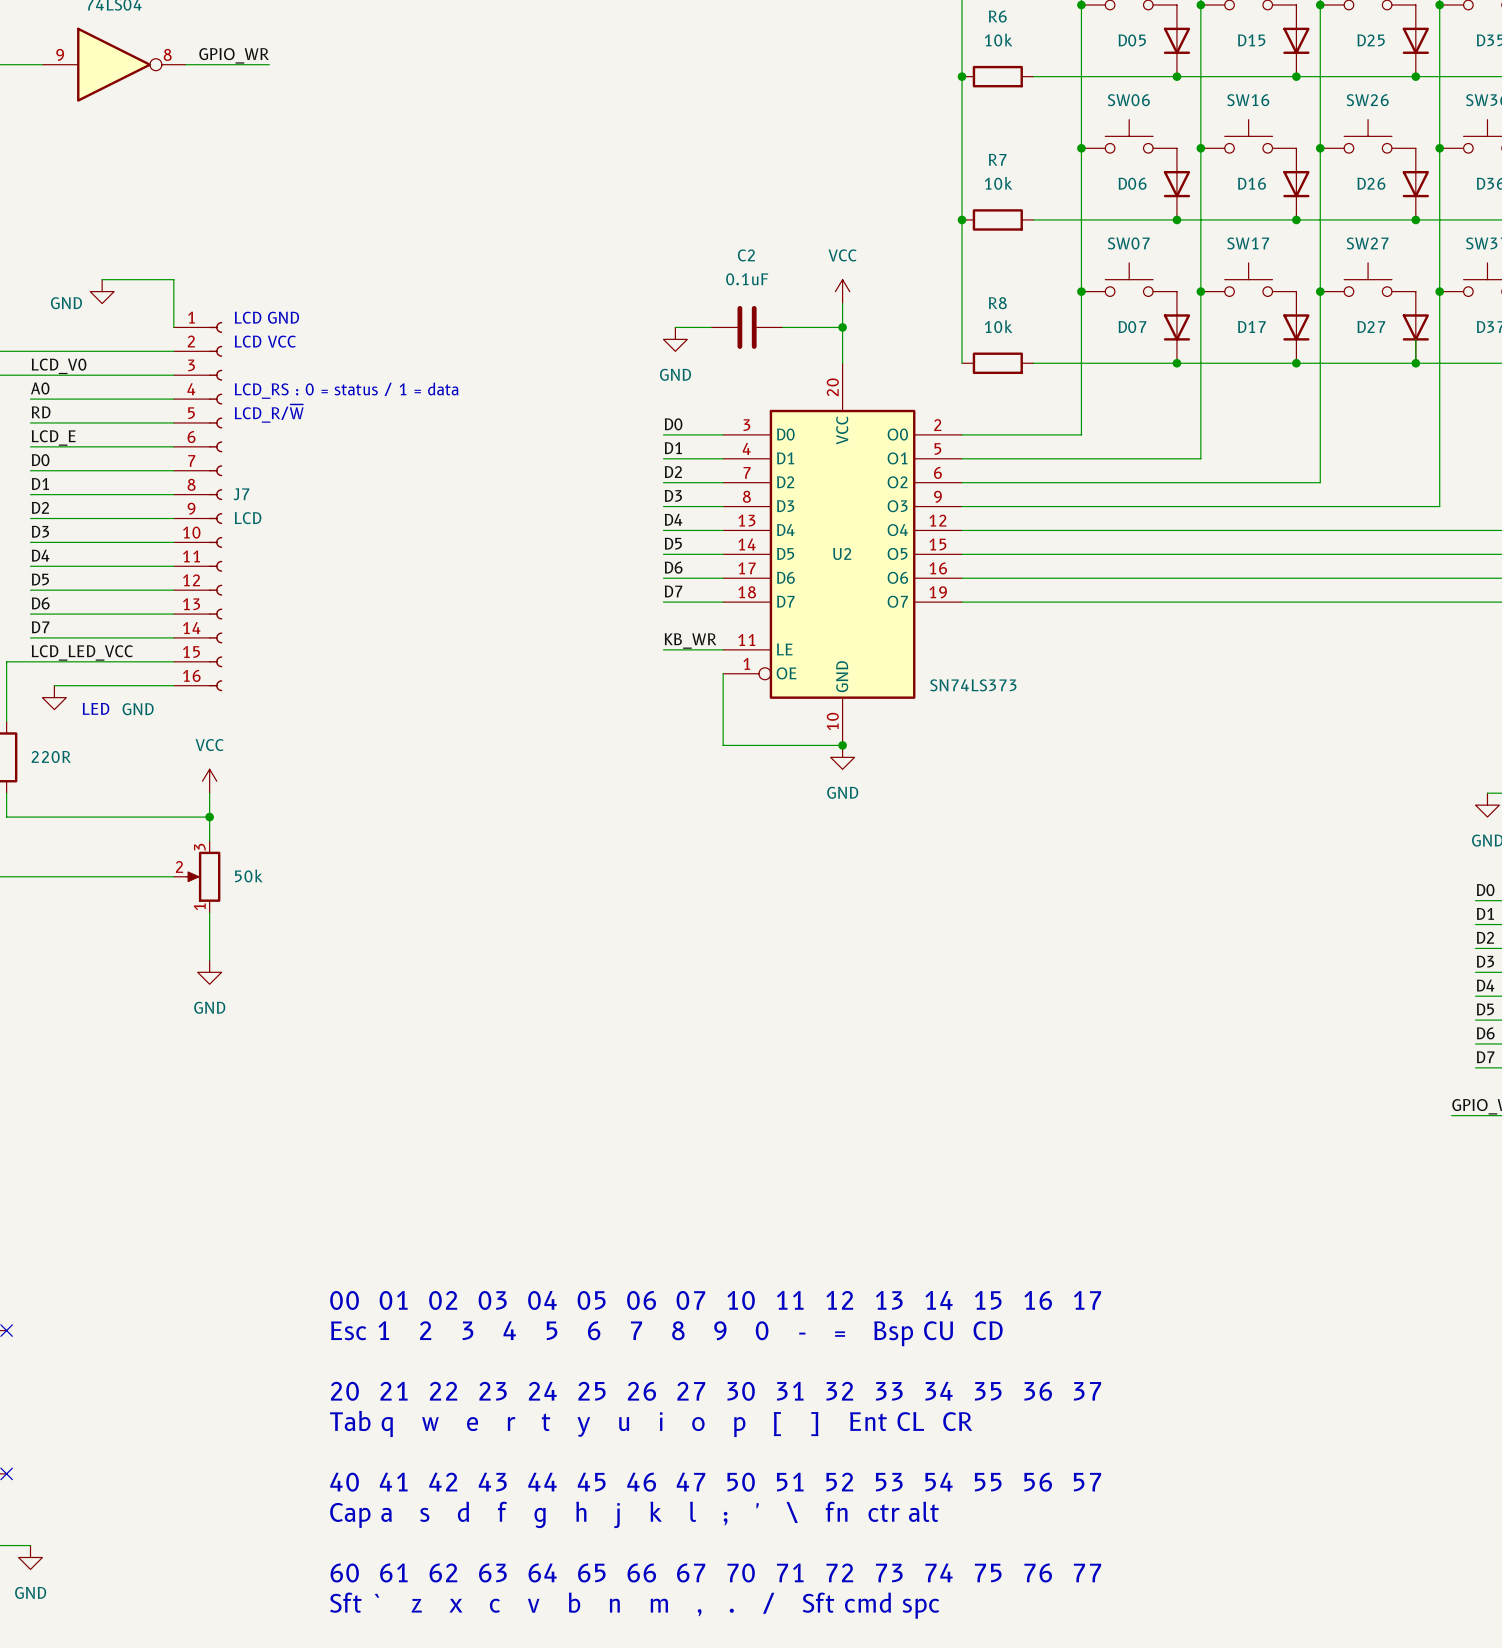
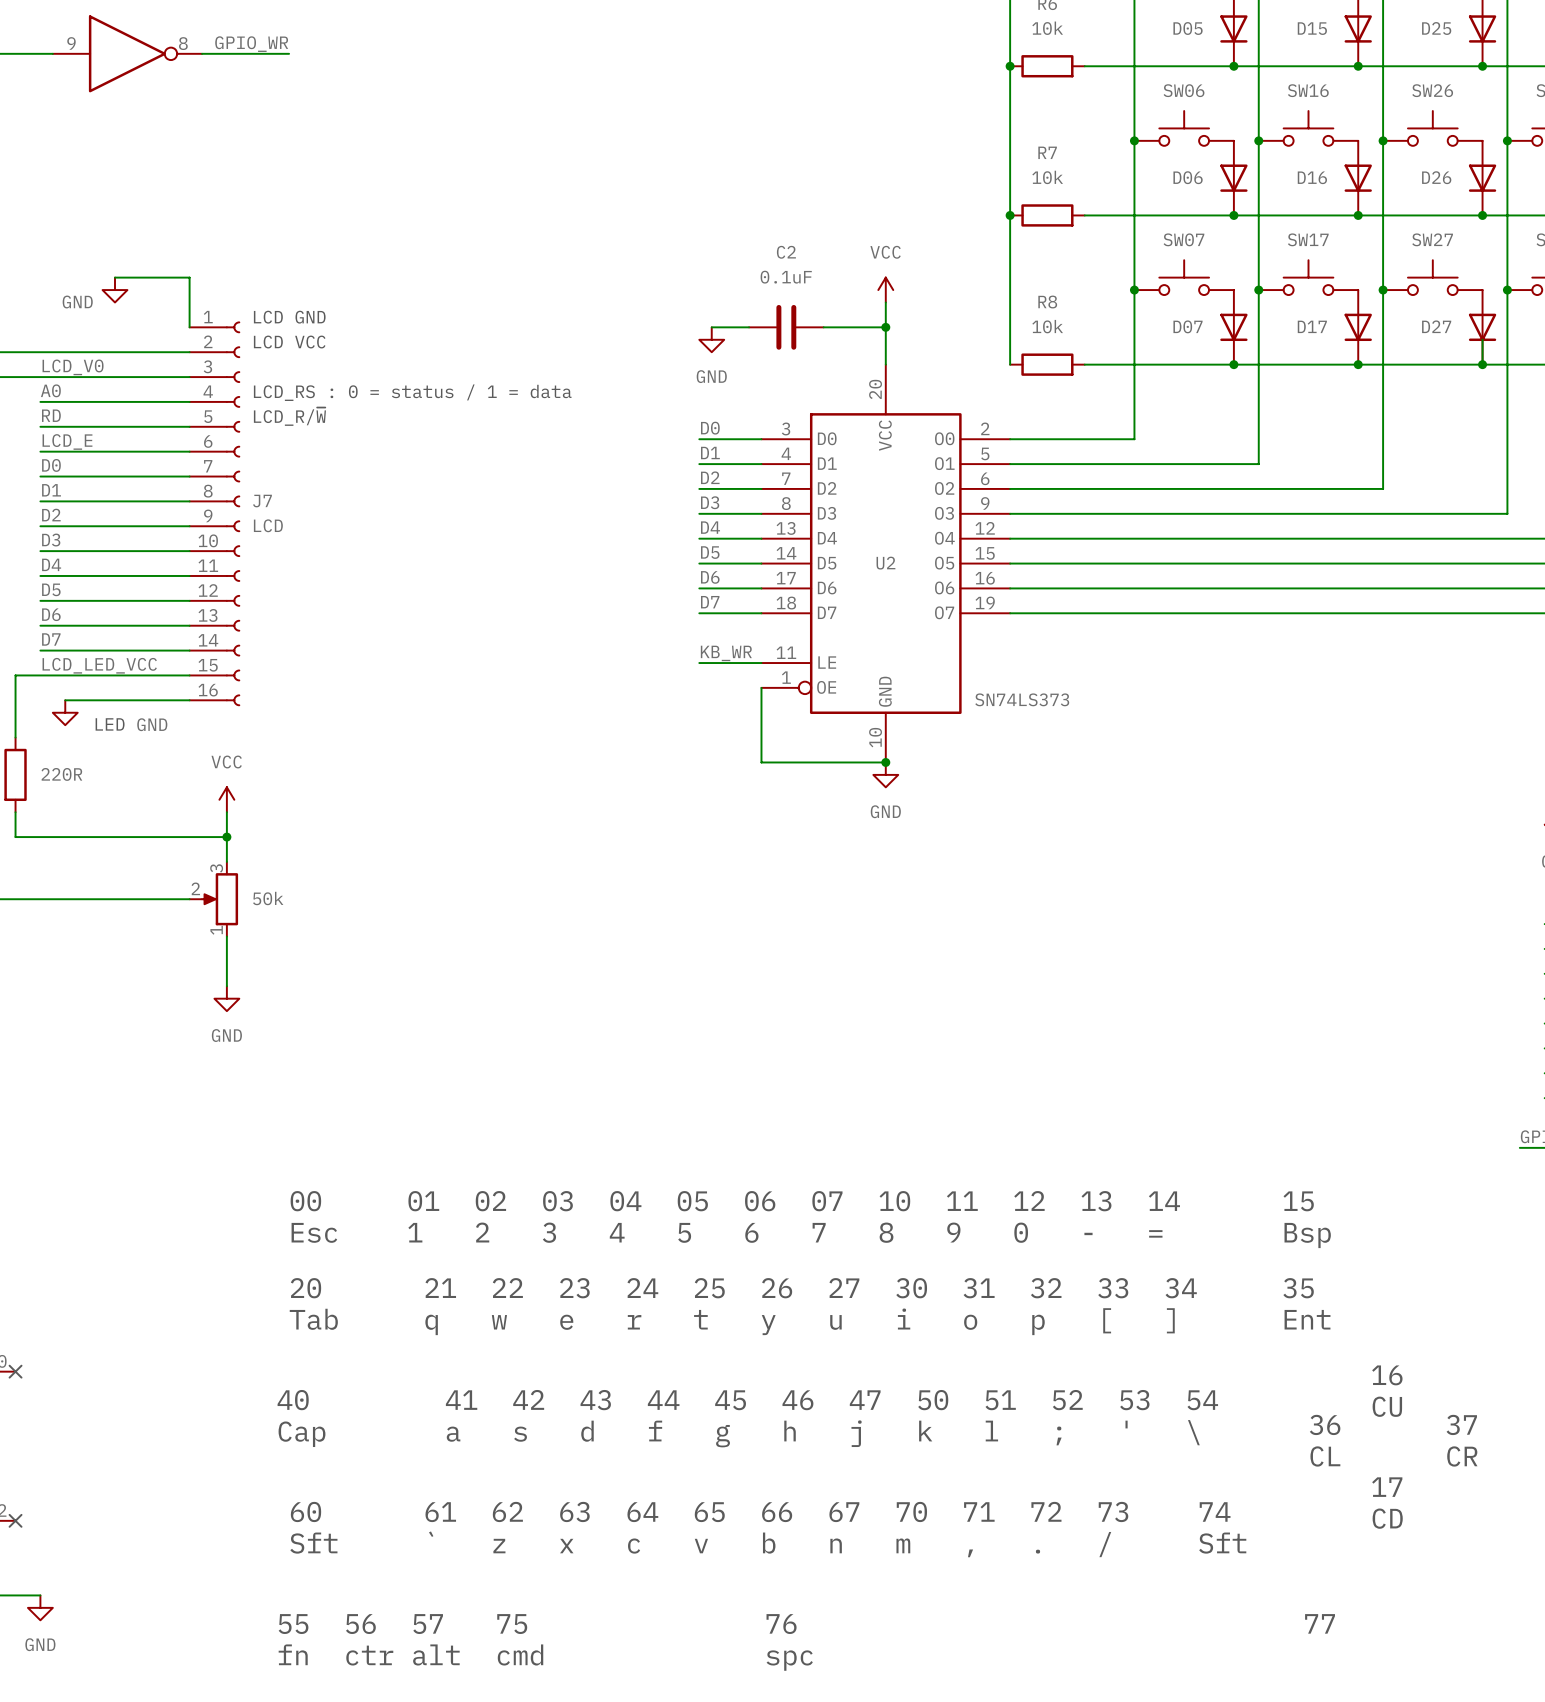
text: none -> 00 01 02 03 04 05 06 07 10 11 12 13 14 15 (802, 1201)
text: none -> Esc 1 2 3 4 5 6 7 8 9 0 - = Bsp (811, 1235)
text: none -> 20 21 22 23 24 25 26 27 30 31 32 33 34 35 (802, 1288)
text: none -> Tab q w e r t y u i o p [ ] Ent (810, 1321)
text: 00 01 02 03 04 05 06 07 10 11 12 13 14 15 16 17 (715, 1300) -> none
text: Esc 1 2 3 4 5 6 7 8 9 0 - = Bsp CU CD (666, 1333) -> none
text: none -> 16 (1387, 1375)
text: none -> CU (1387, 1406)
text: none -> 36 (1325, 1424)
text: none -> 37 (1461, 1424)
text: none -> Cap a s d f g h j k l ; ' \ (739, 1433)
text: 20 21 22 23 24 25 26 27 30 31 32 33 34 35 36 37 (716, 1391) -> 40 41 42 43 44 45 46 47 50 51 52 53 54 (747, 1400)
text: none -> CL (1325, 1456)
text: none -> CR (1462, 1456)
text: Tab q w e r t y u i o p [ ] Ent CL CR (651, 1423) -> none
text: none -> 17 (1387, 1487)
text: none -> CD (1387, 1518)
text: 40 41 42 43 44 45 46 47 50 51 52 53 54 55 56 57 (715, 1482) -> 60 61 62 63 64 65 66 67 70 71 72 73 74 (760, 1511)
text: Cap a s d f g h j k l ; ' \ fn ctr alt (634, 1514) -> Sft ` z x c v b n m , . / Sft (768, 1544)
text: none -> 55 56 57 75 76 77 (806, 1624)
text: 60 61 62 63 64 65 66 67 70 71 72 73 74 75 76 77 (715, 1572) -> none
text: none -> fn ctr alt cmd spc (545, 1657)
text: Sft ` z x c v b n m , . / Sft cmd spc (634, 1605) -> none

